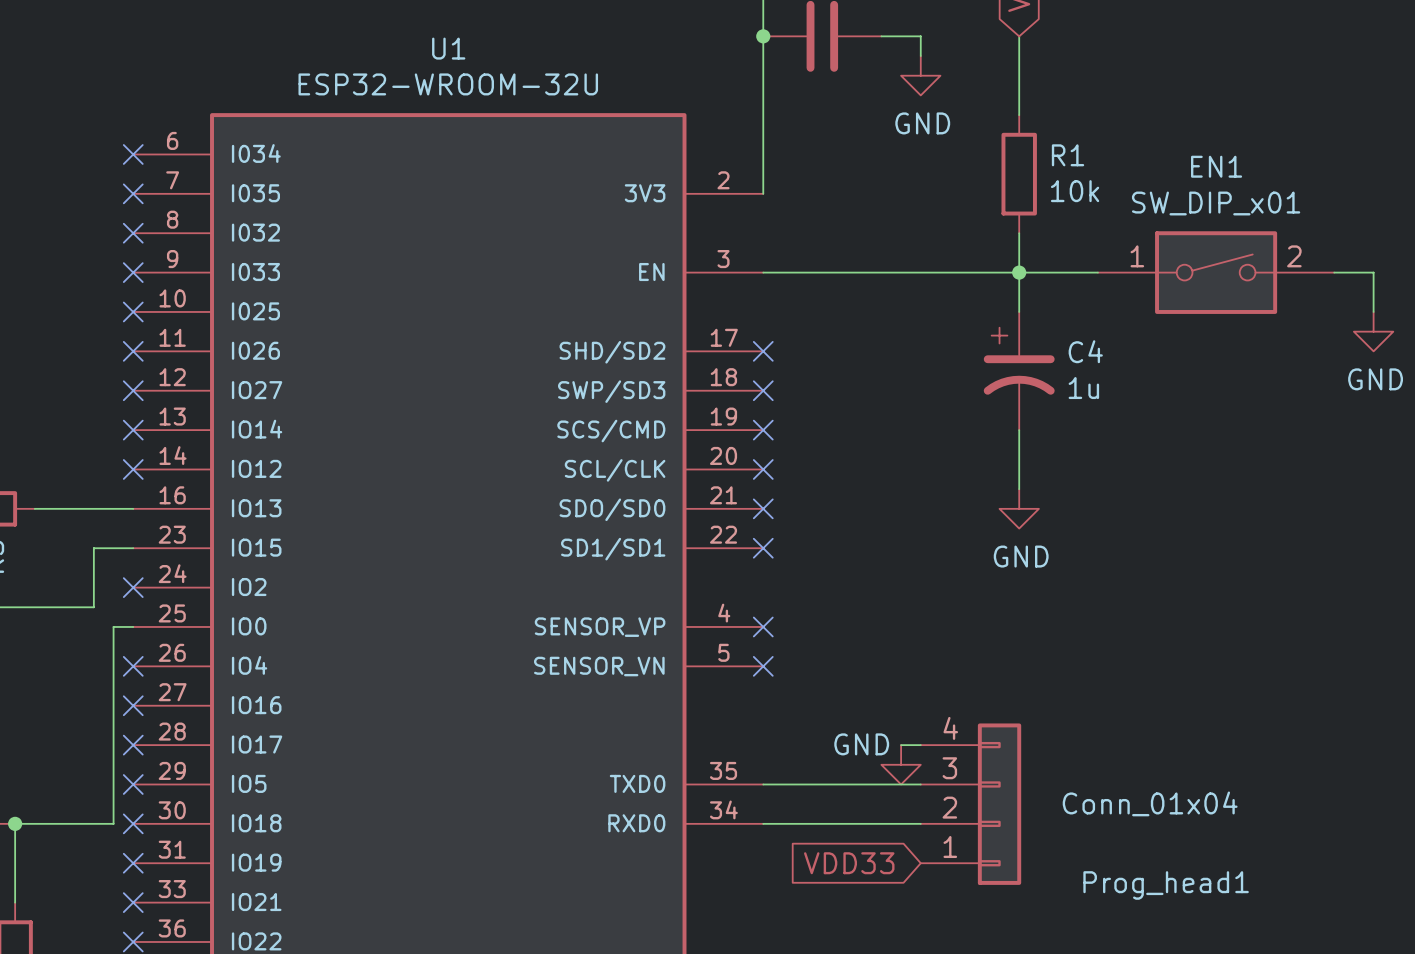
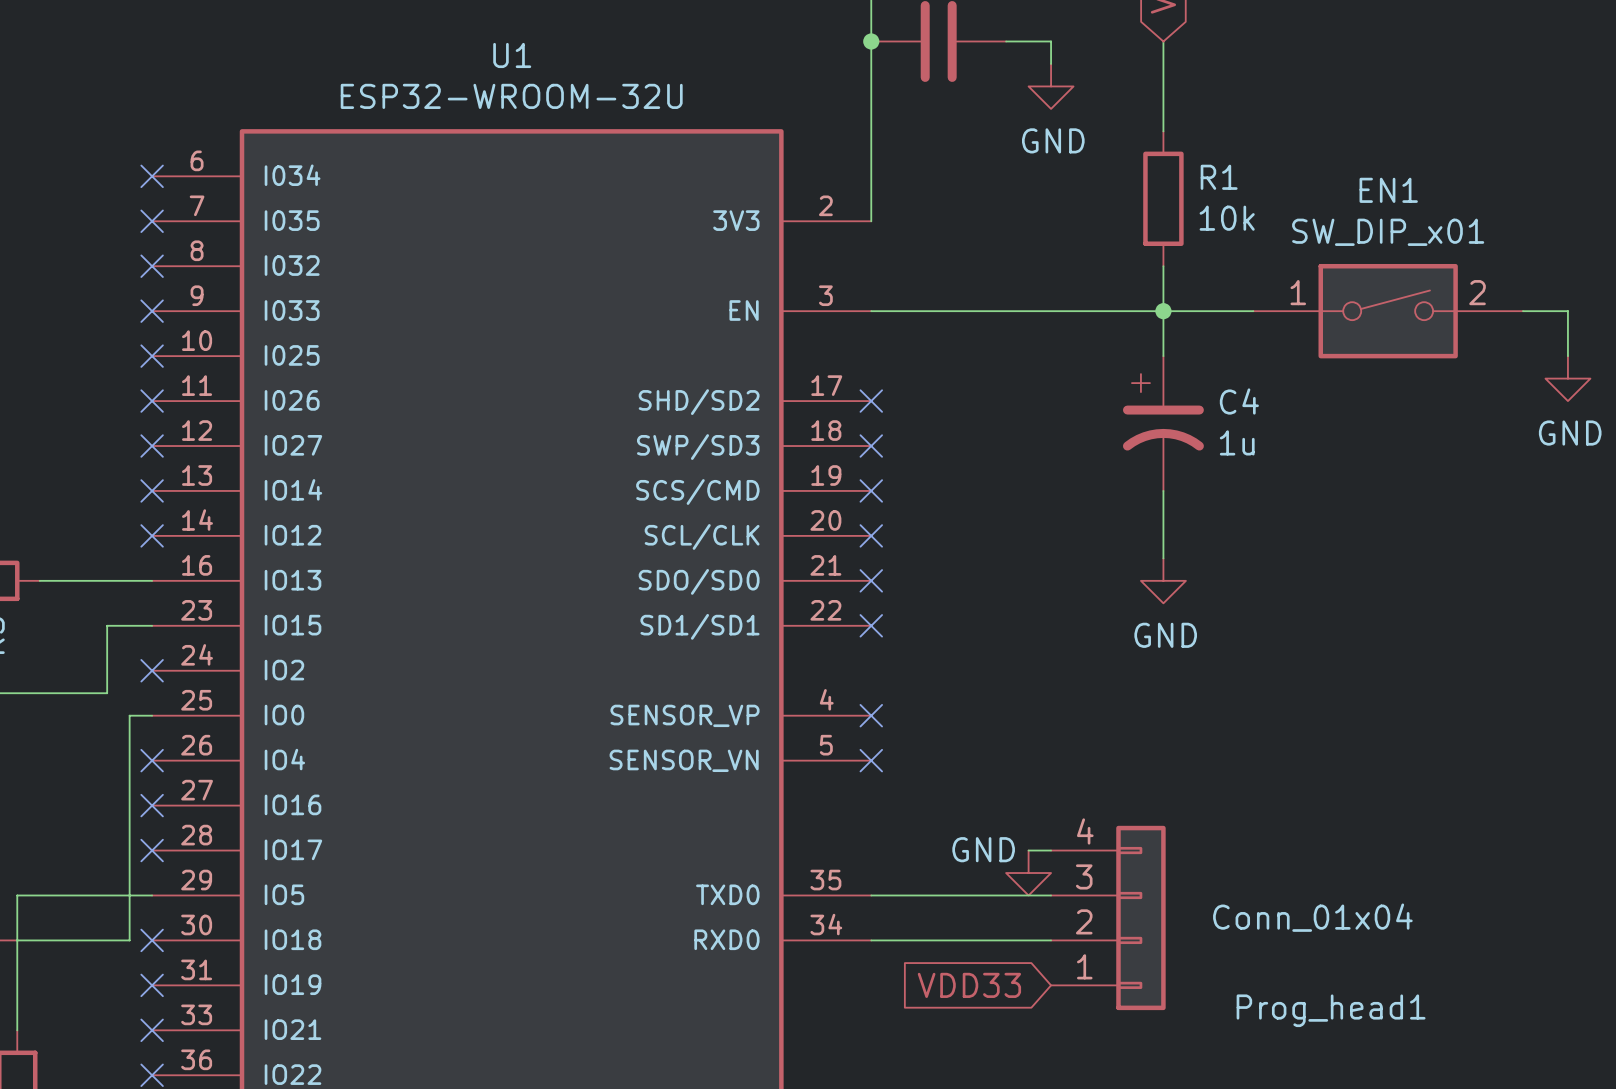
wire: none -> (152, 895) (17, 895) (17, 940)
no-connect mark: (133, 784) -> none
junction: (15, 823) -> none

